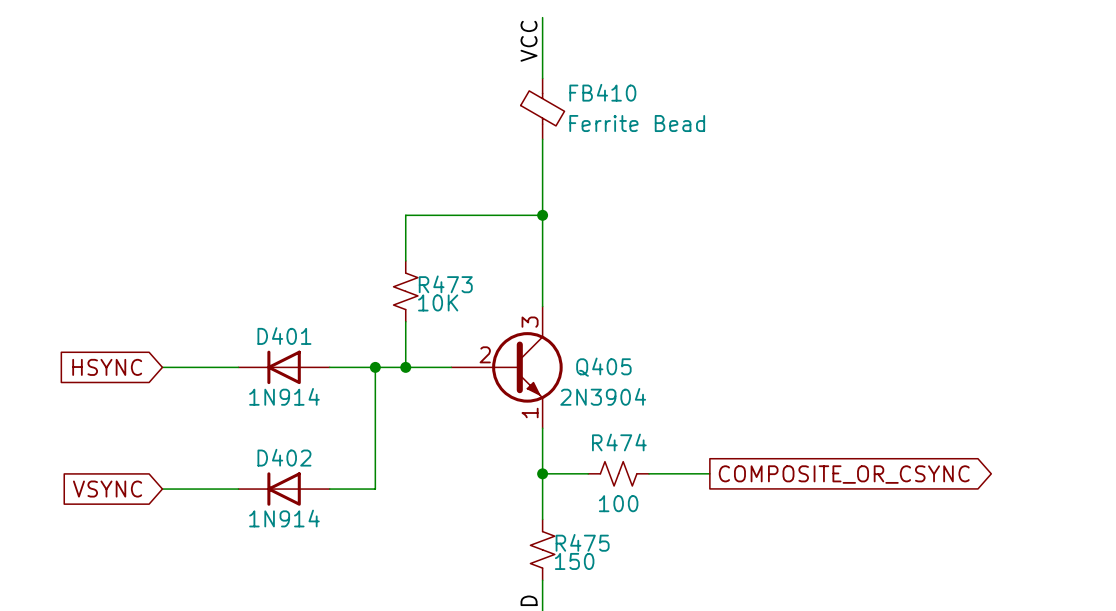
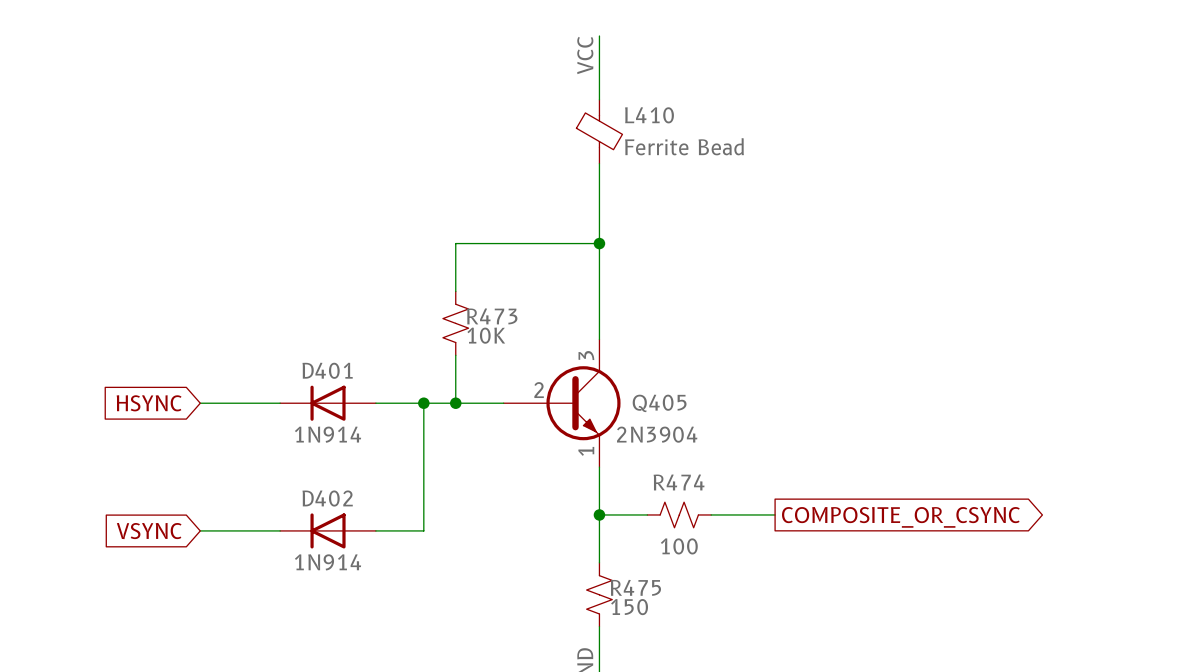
FB410 name: FB410 (602, 92) -> L410 (649, 115)

